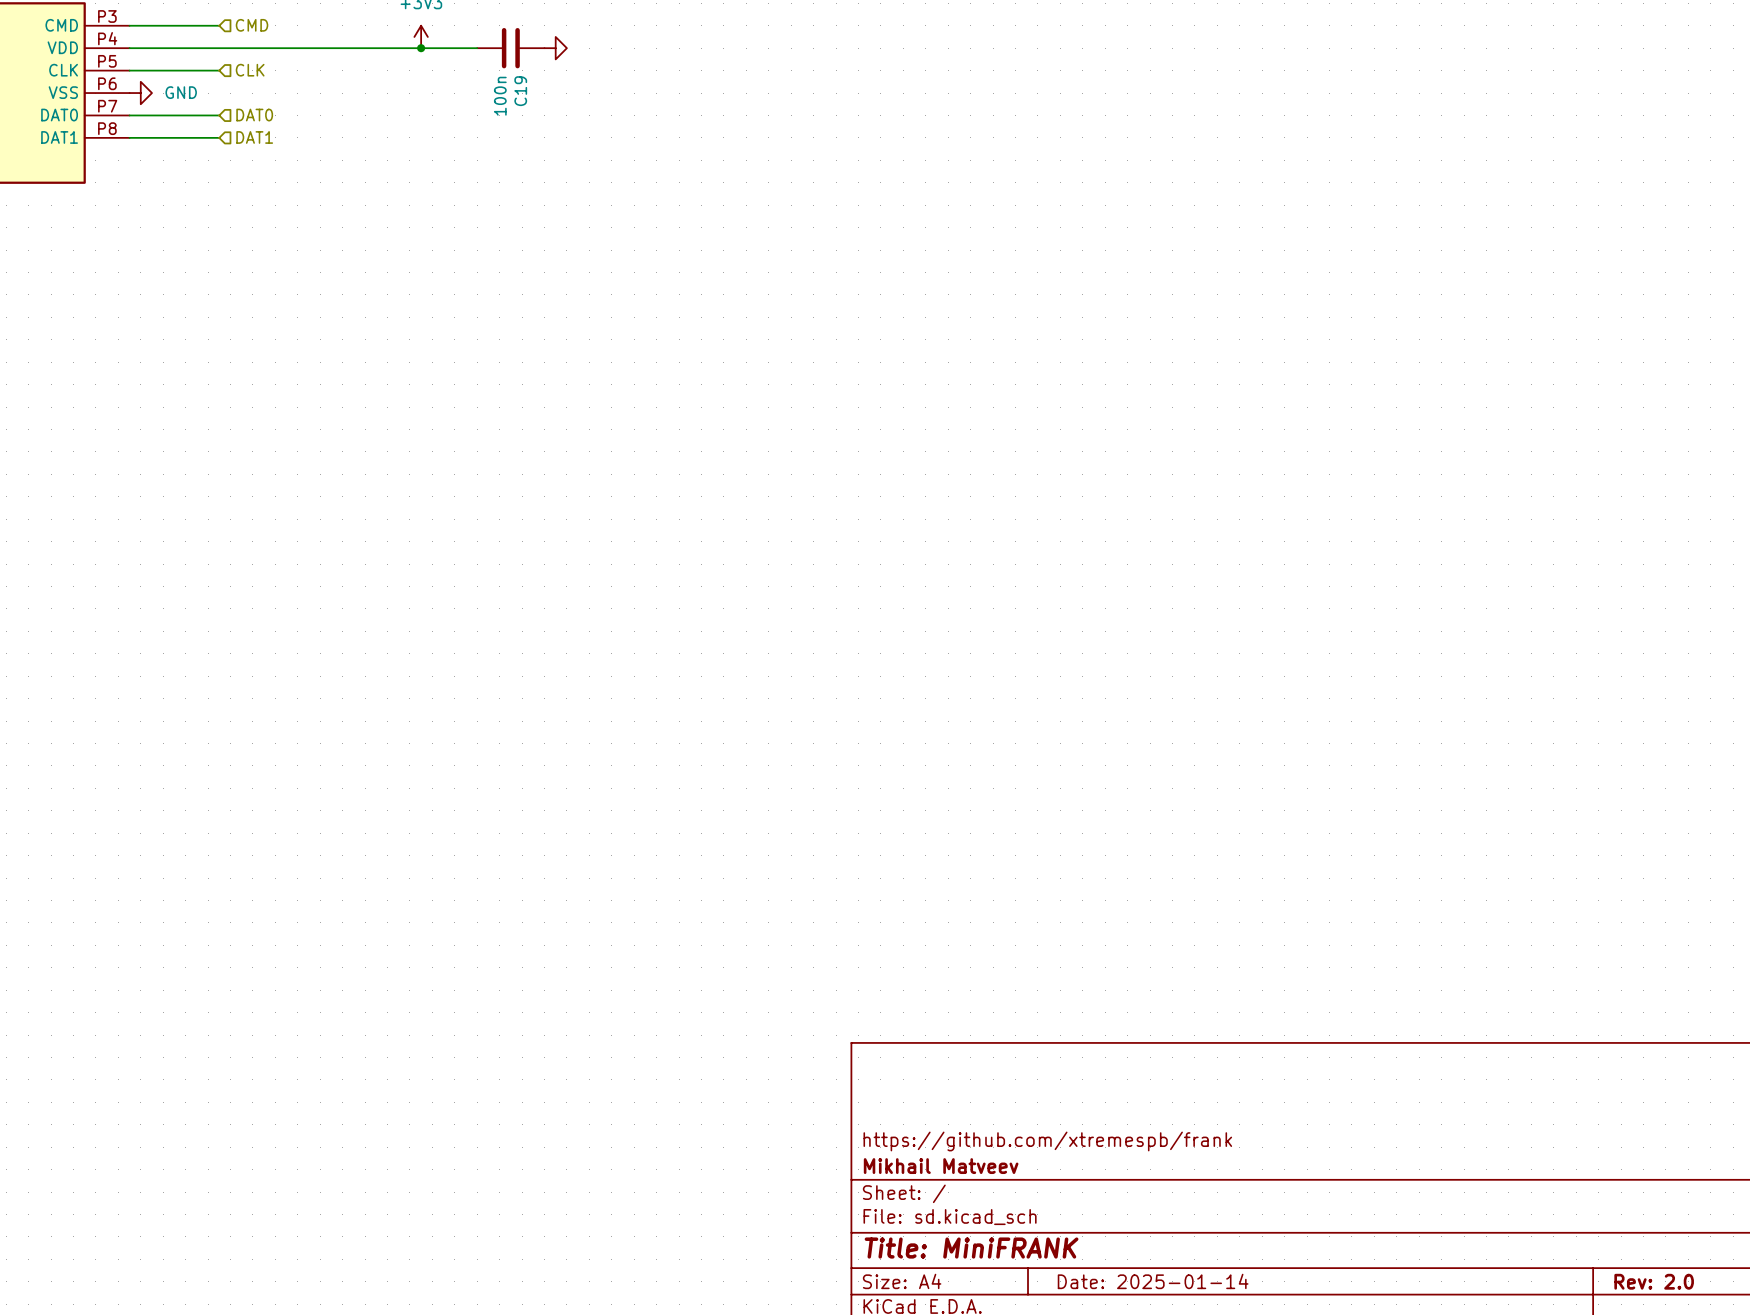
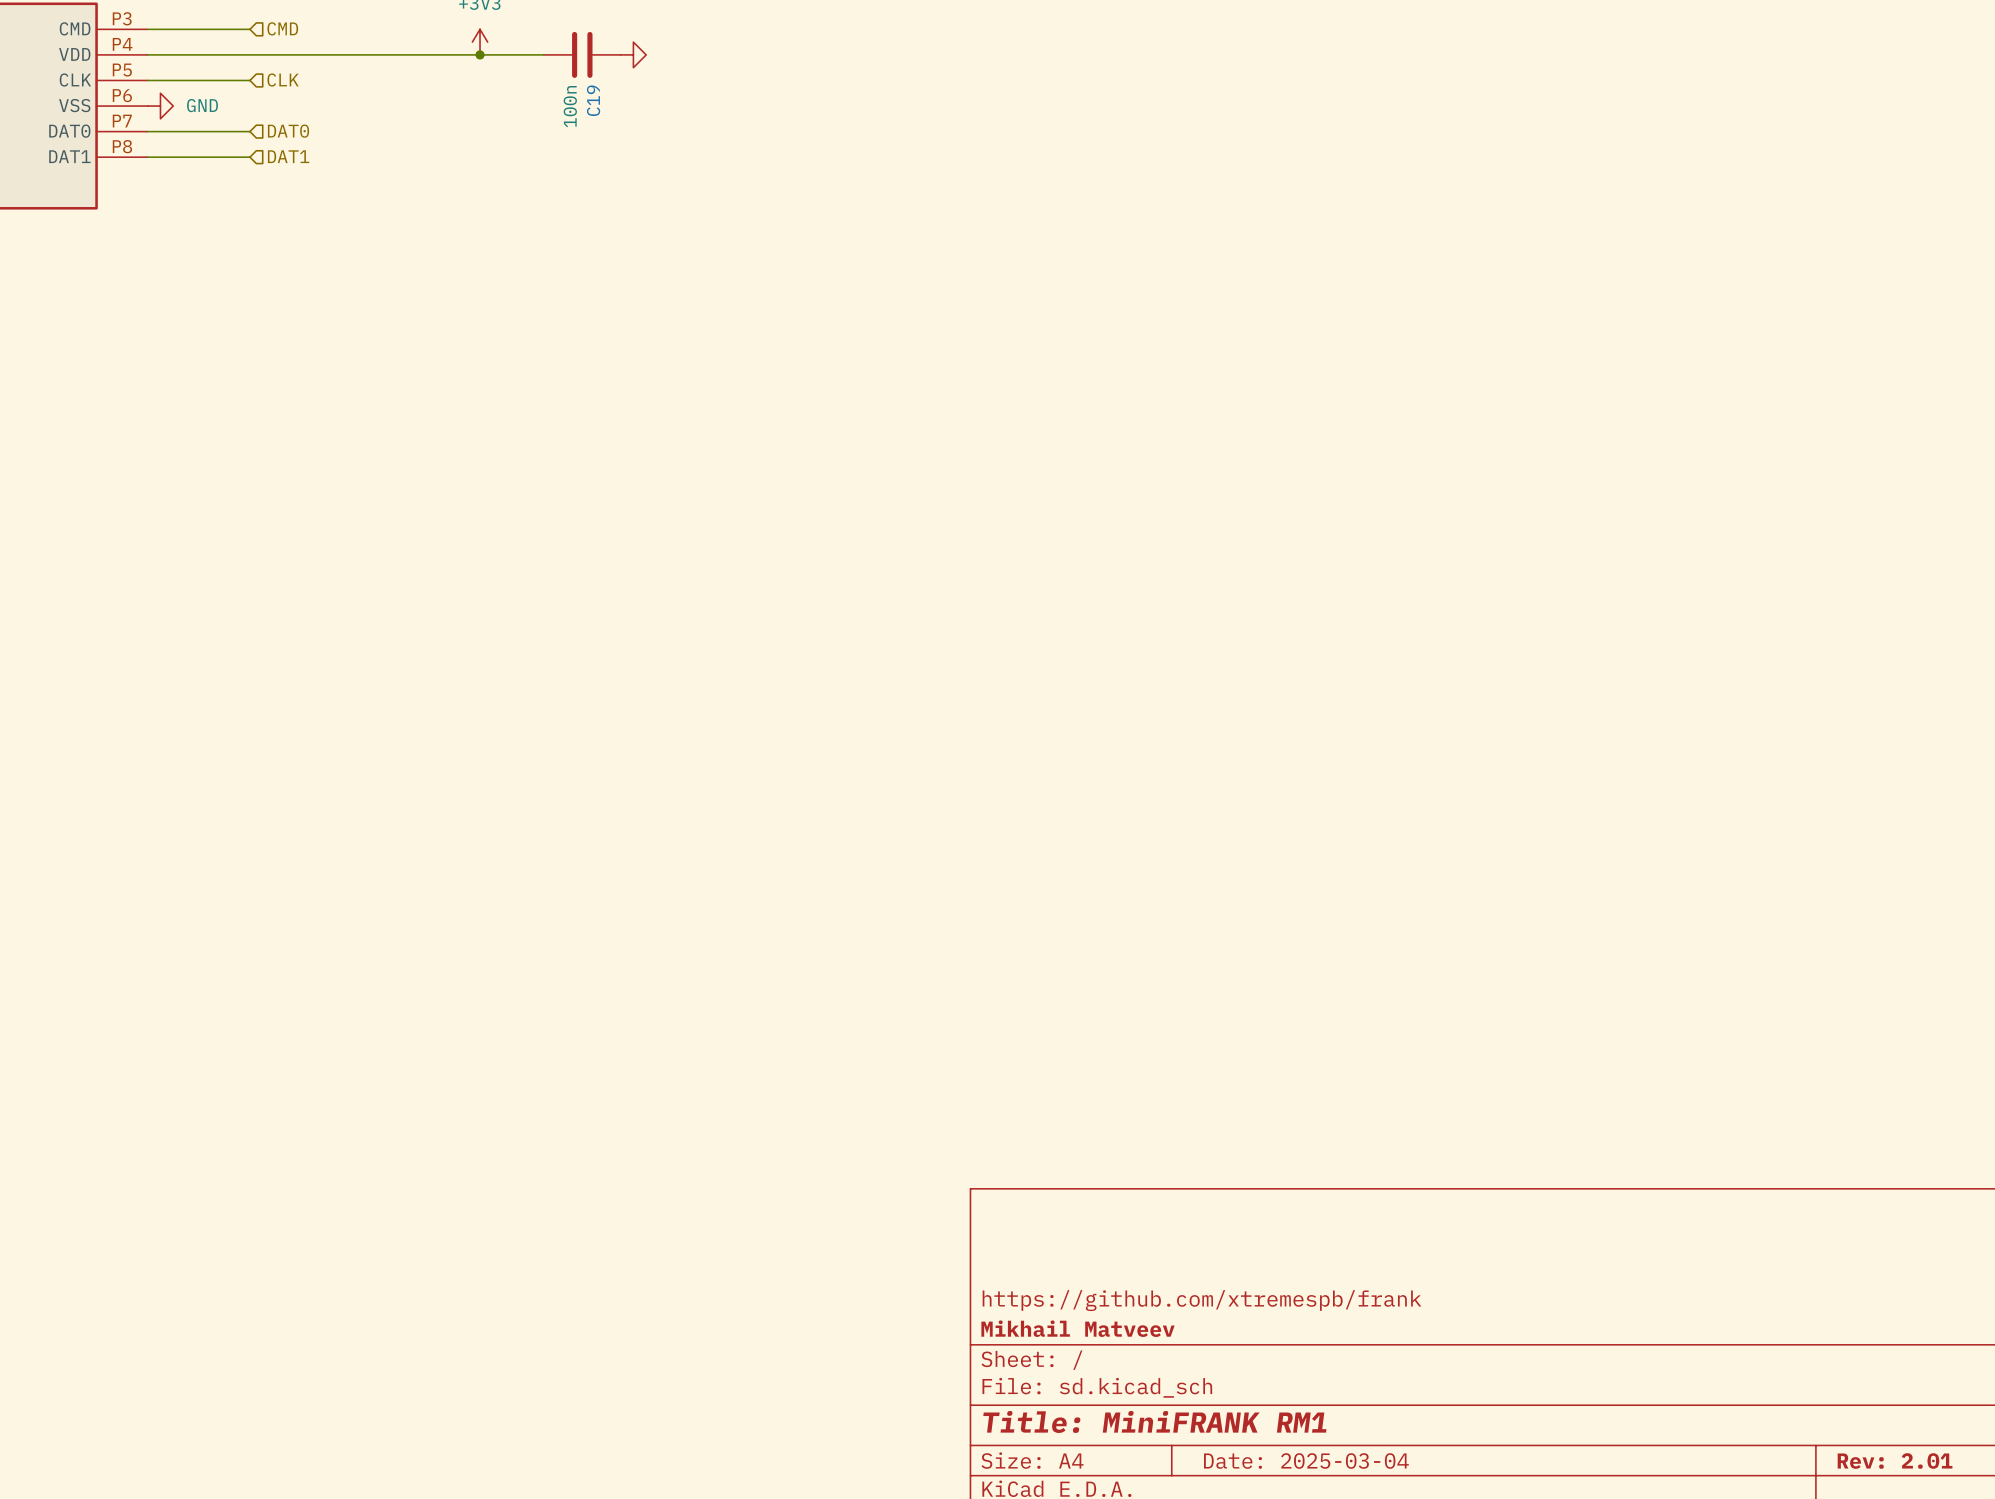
title block: Title: MiniFRANK (971, 1248) -> Title: MiniFRANK RM1 (1154, 1421)
title block: Date: 2025-01-14 (1153, 1281) -> Date: 2025-03-04 (1306, 1461)
title block: Rev: 2.0 (1654, 1281) -> Rev: 2.01 (1895, 1461)

